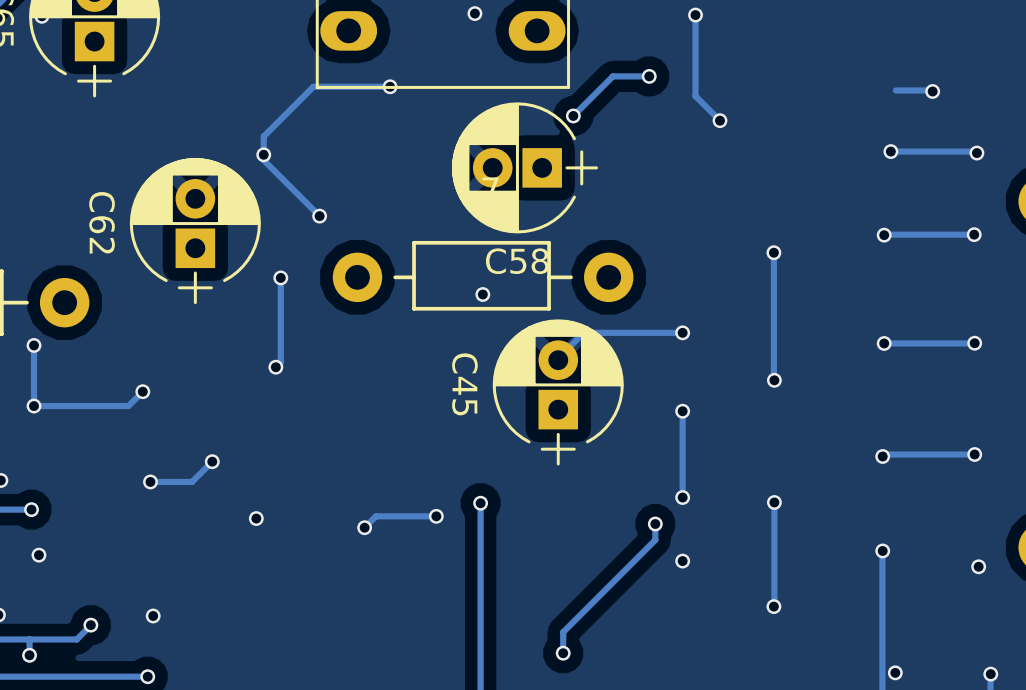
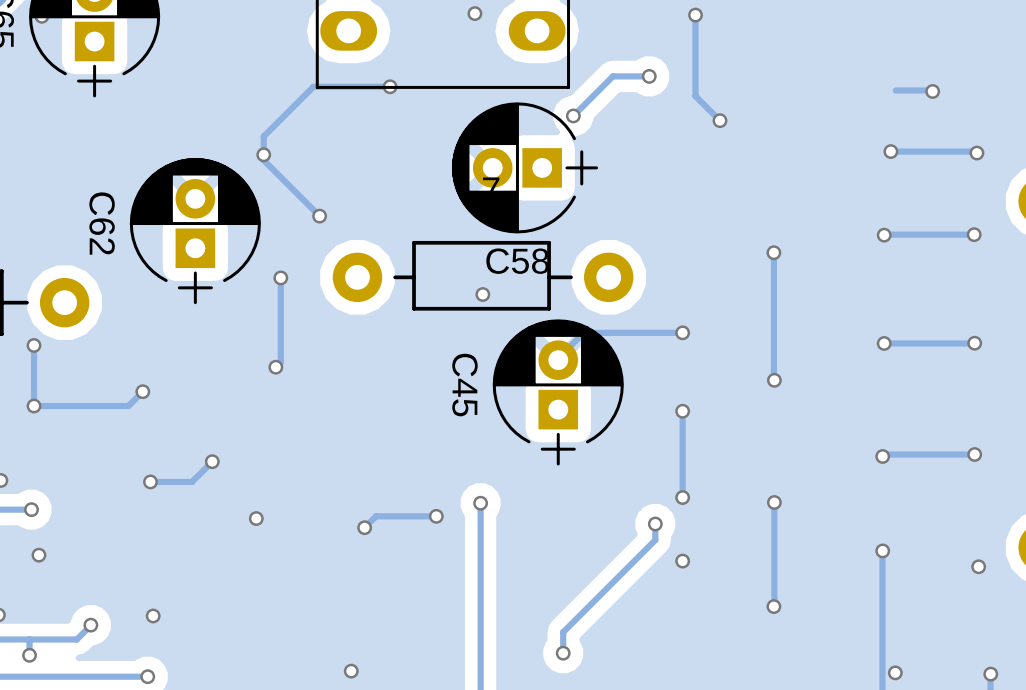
via: none -> (351, 671)

